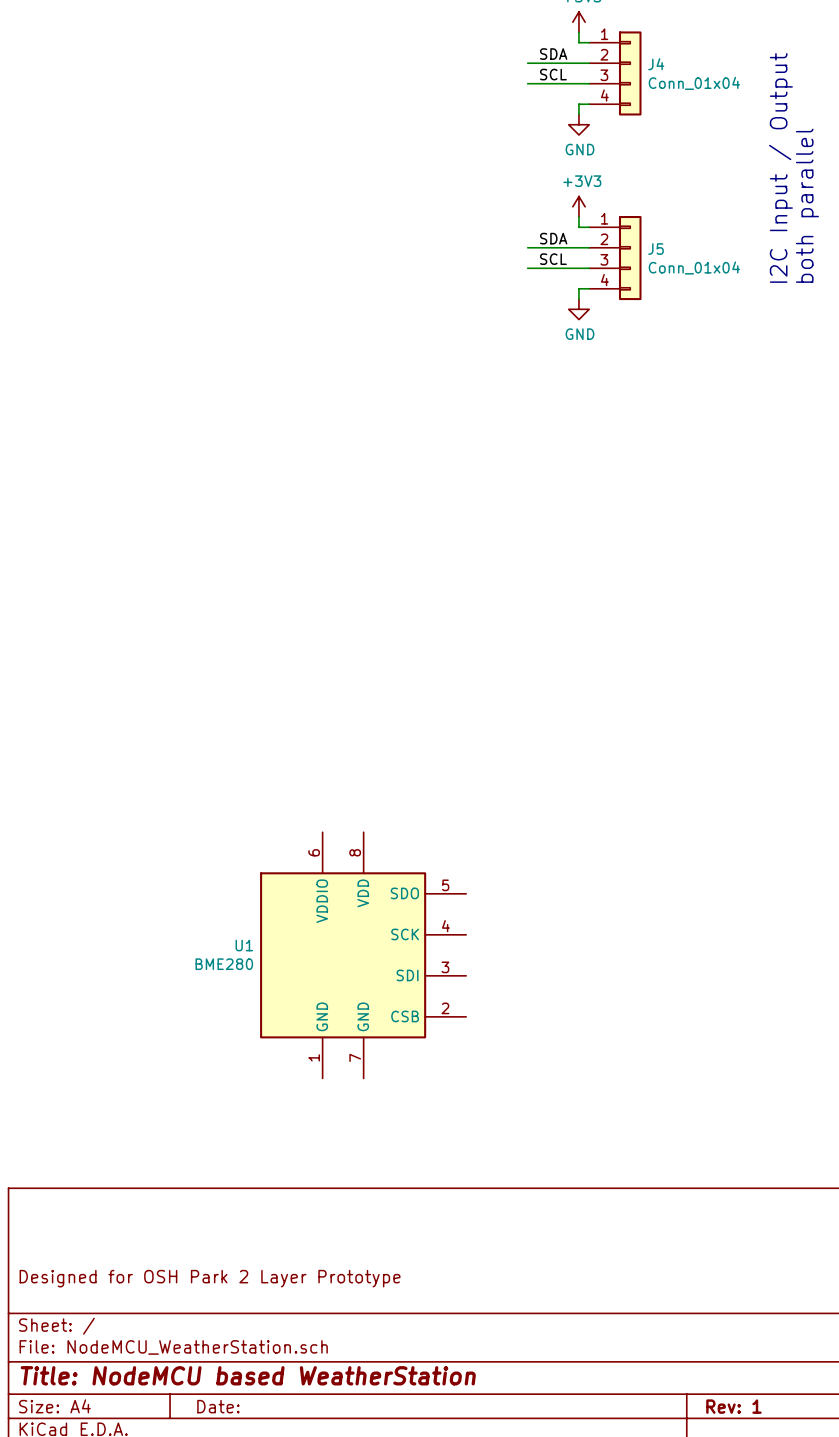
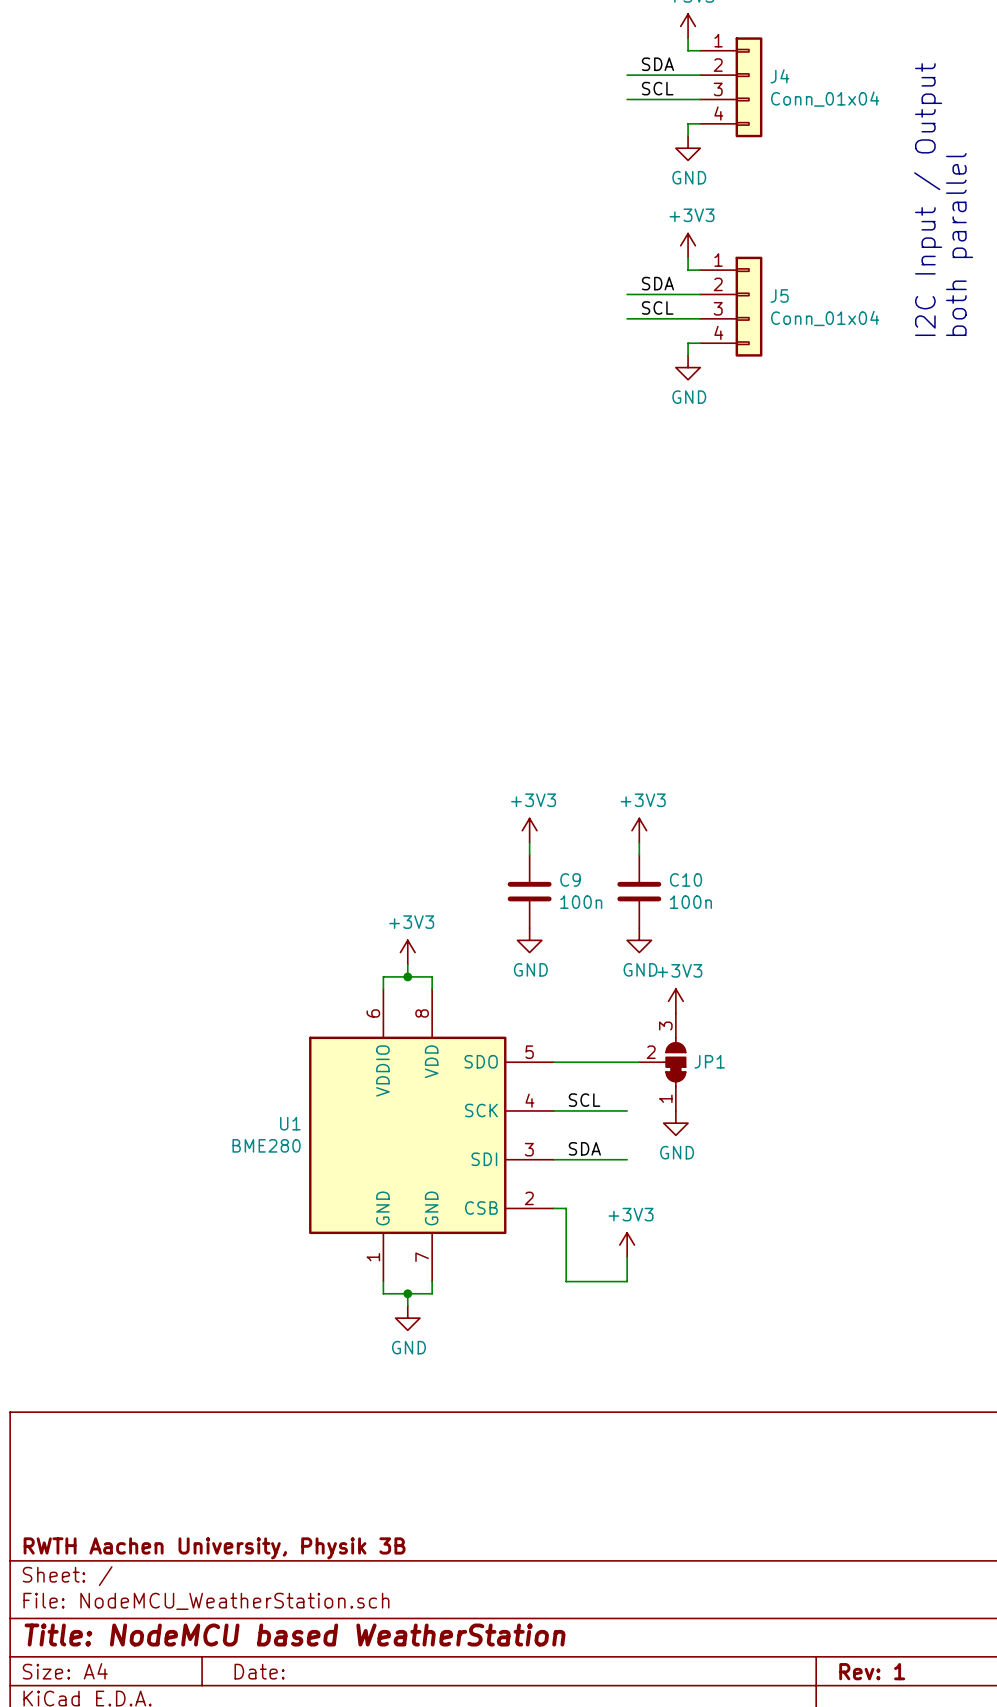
power symbol: none -> +3V3 (529, 830)
power symbol: none -> +3V3 (639, 830)
wire: none -> (529, 842) (529, 855)
wire: none -> (639, 842) (639, 855)
C9: none -> 100n (529, 891)
C10: none -> 100n (639, 891)
power symbol: none -> GND (529, 940)
power symbol: none -> GND (639, 940)
power symbol: none -> +3V3 (407, 952)
wire: none -> (407, 964) (407, 976)
junction: none -> (407, 976)
wire: none -> (383, 989) (383, 976) (432, 976) (432, 989)
power symbol: none -> +3V3 (675, 1001)
wire: none -> (554, 1062) (639, 1062)
JP1: none -> (662, 1062)
label: none -> SCL (584, 1100)
wire: none -> (554, 1110) (627, 1110)
power symbol: none -> GND (675, 1123)
label: none -> SDA (584, 1148)
wire: none -> (554, 1159) (627, 1159)
wire: none -> (554, 1208) (566, 1208) (566, 1281) (627, 1281) (627, 1257)
power symbol: none -> +3V3 (627, 1245)
wire: none -> (383, 1281) (383, 1293) (432, 1293) (432, 1281)
wire: none -> (407, 1293) (407, 1305)
junction: none -> (407, 1293)
power symbol: none -> GND (407, 1318)
title block: Designed for OSH Park 2 Layer Prototype (210, 1278) -> none
title block: none -> RWTH Aachen University, Physik 3B (214, 1548)

